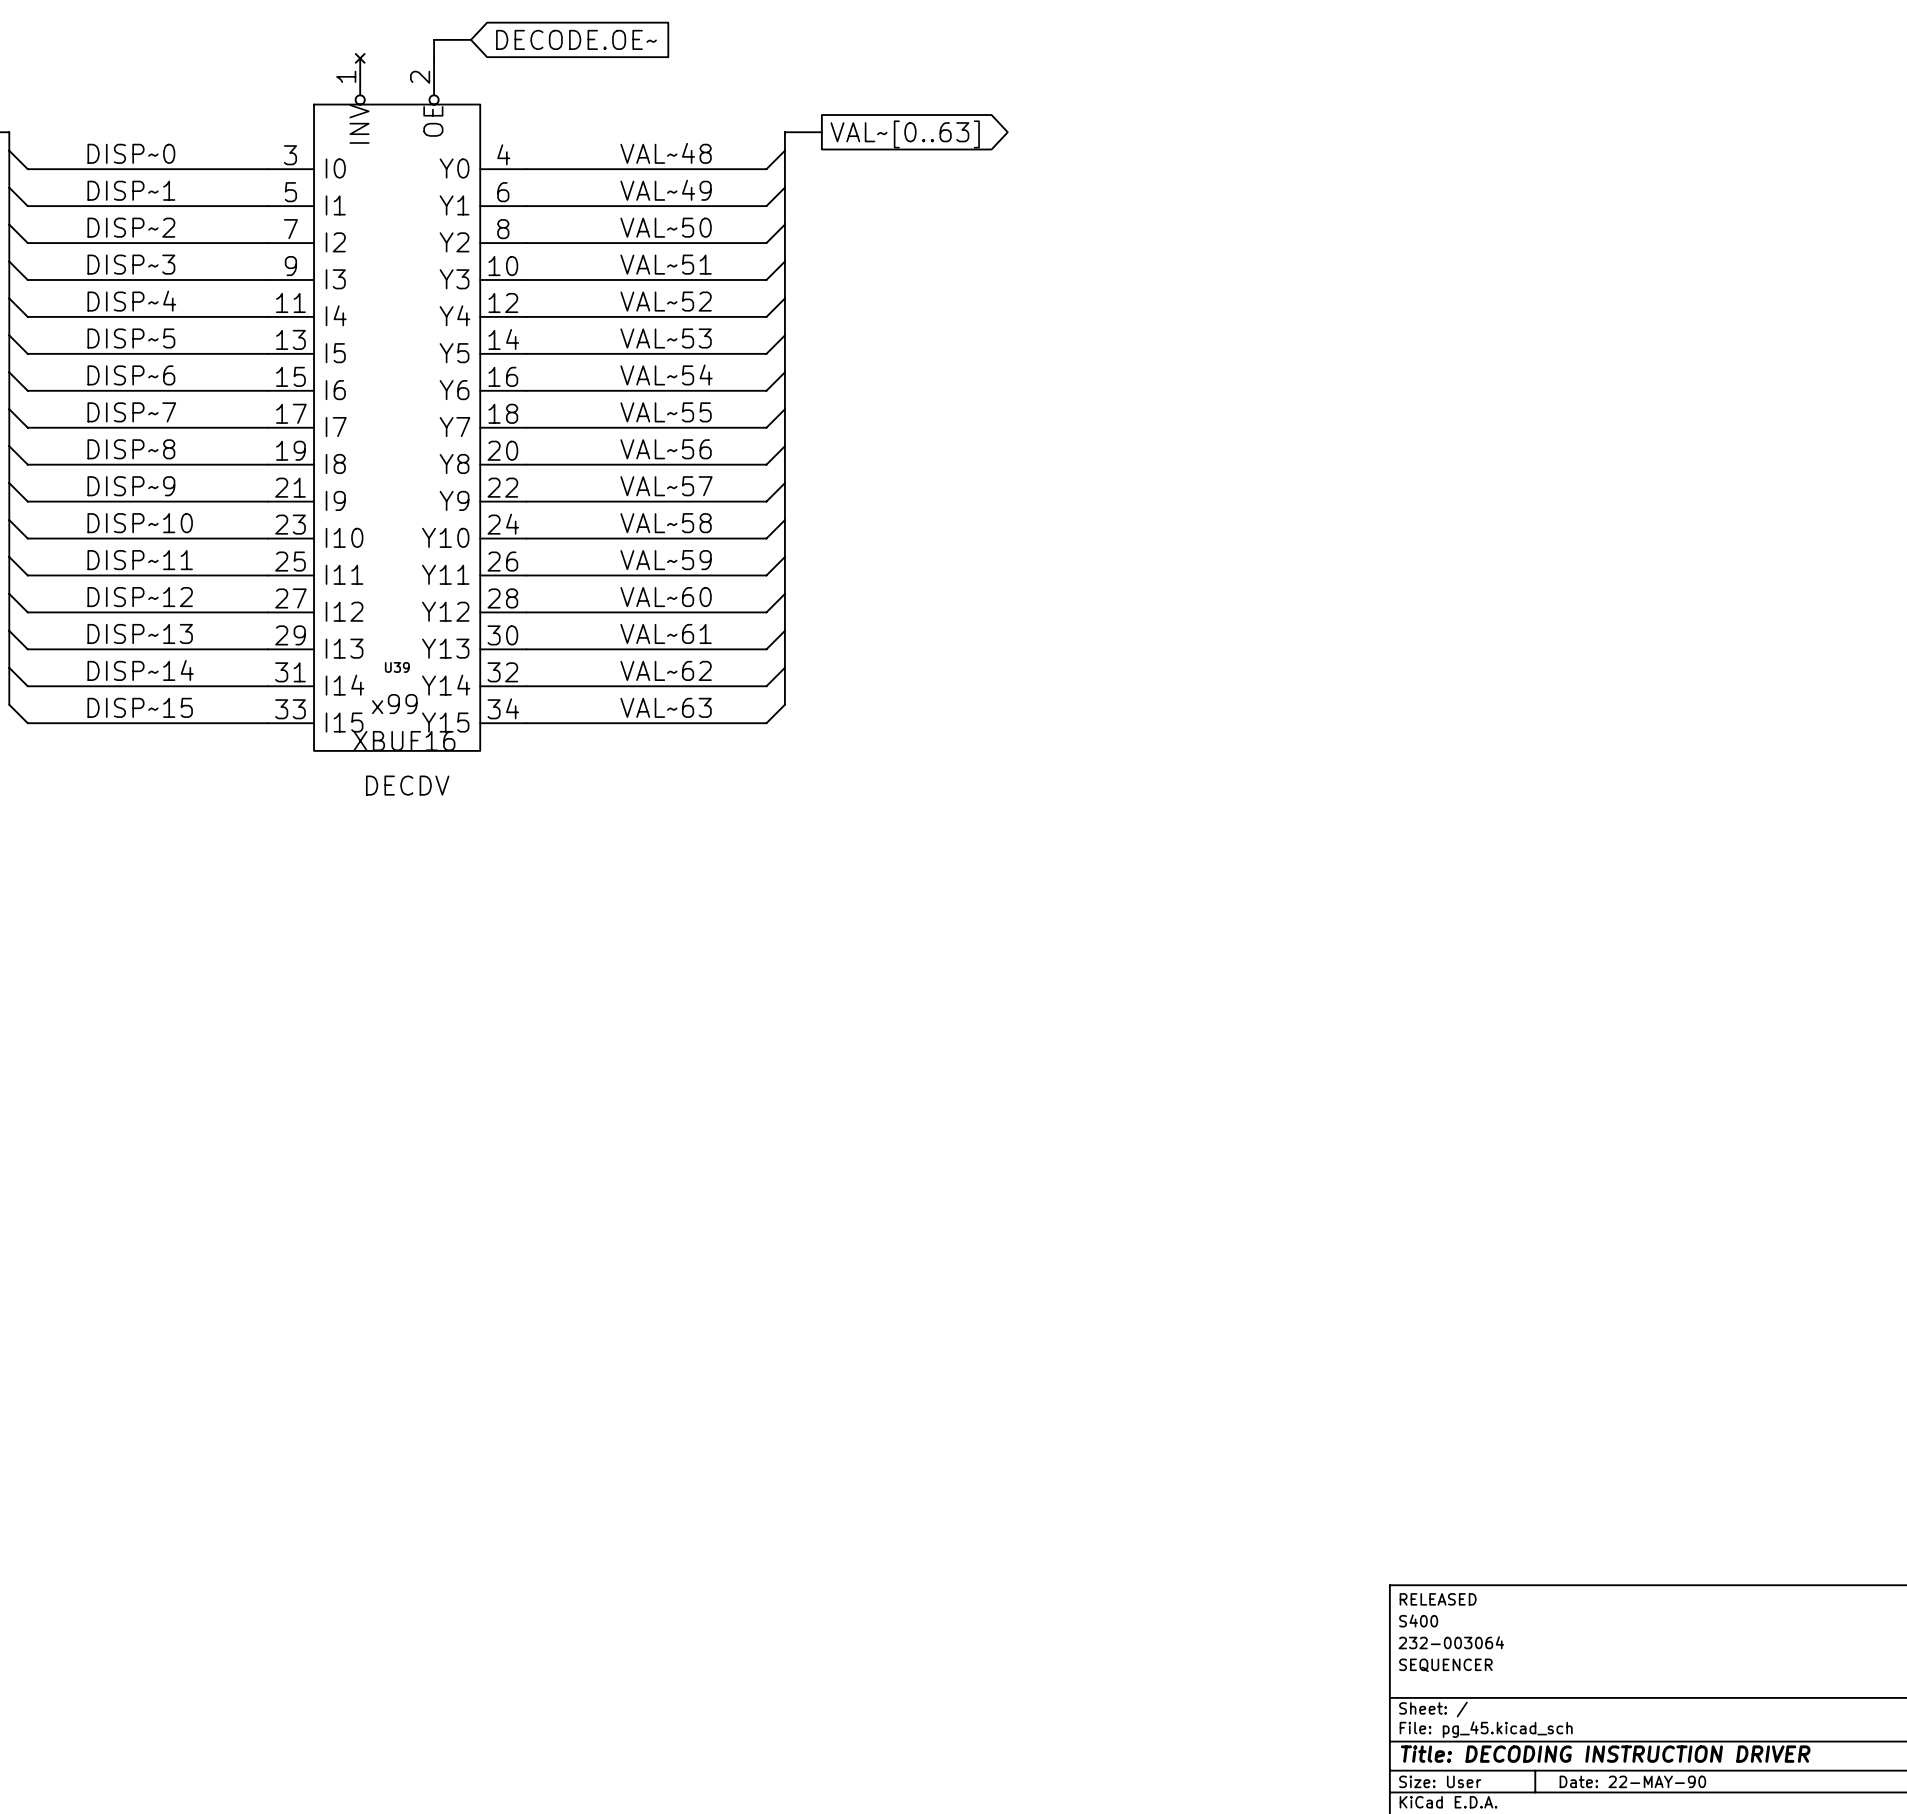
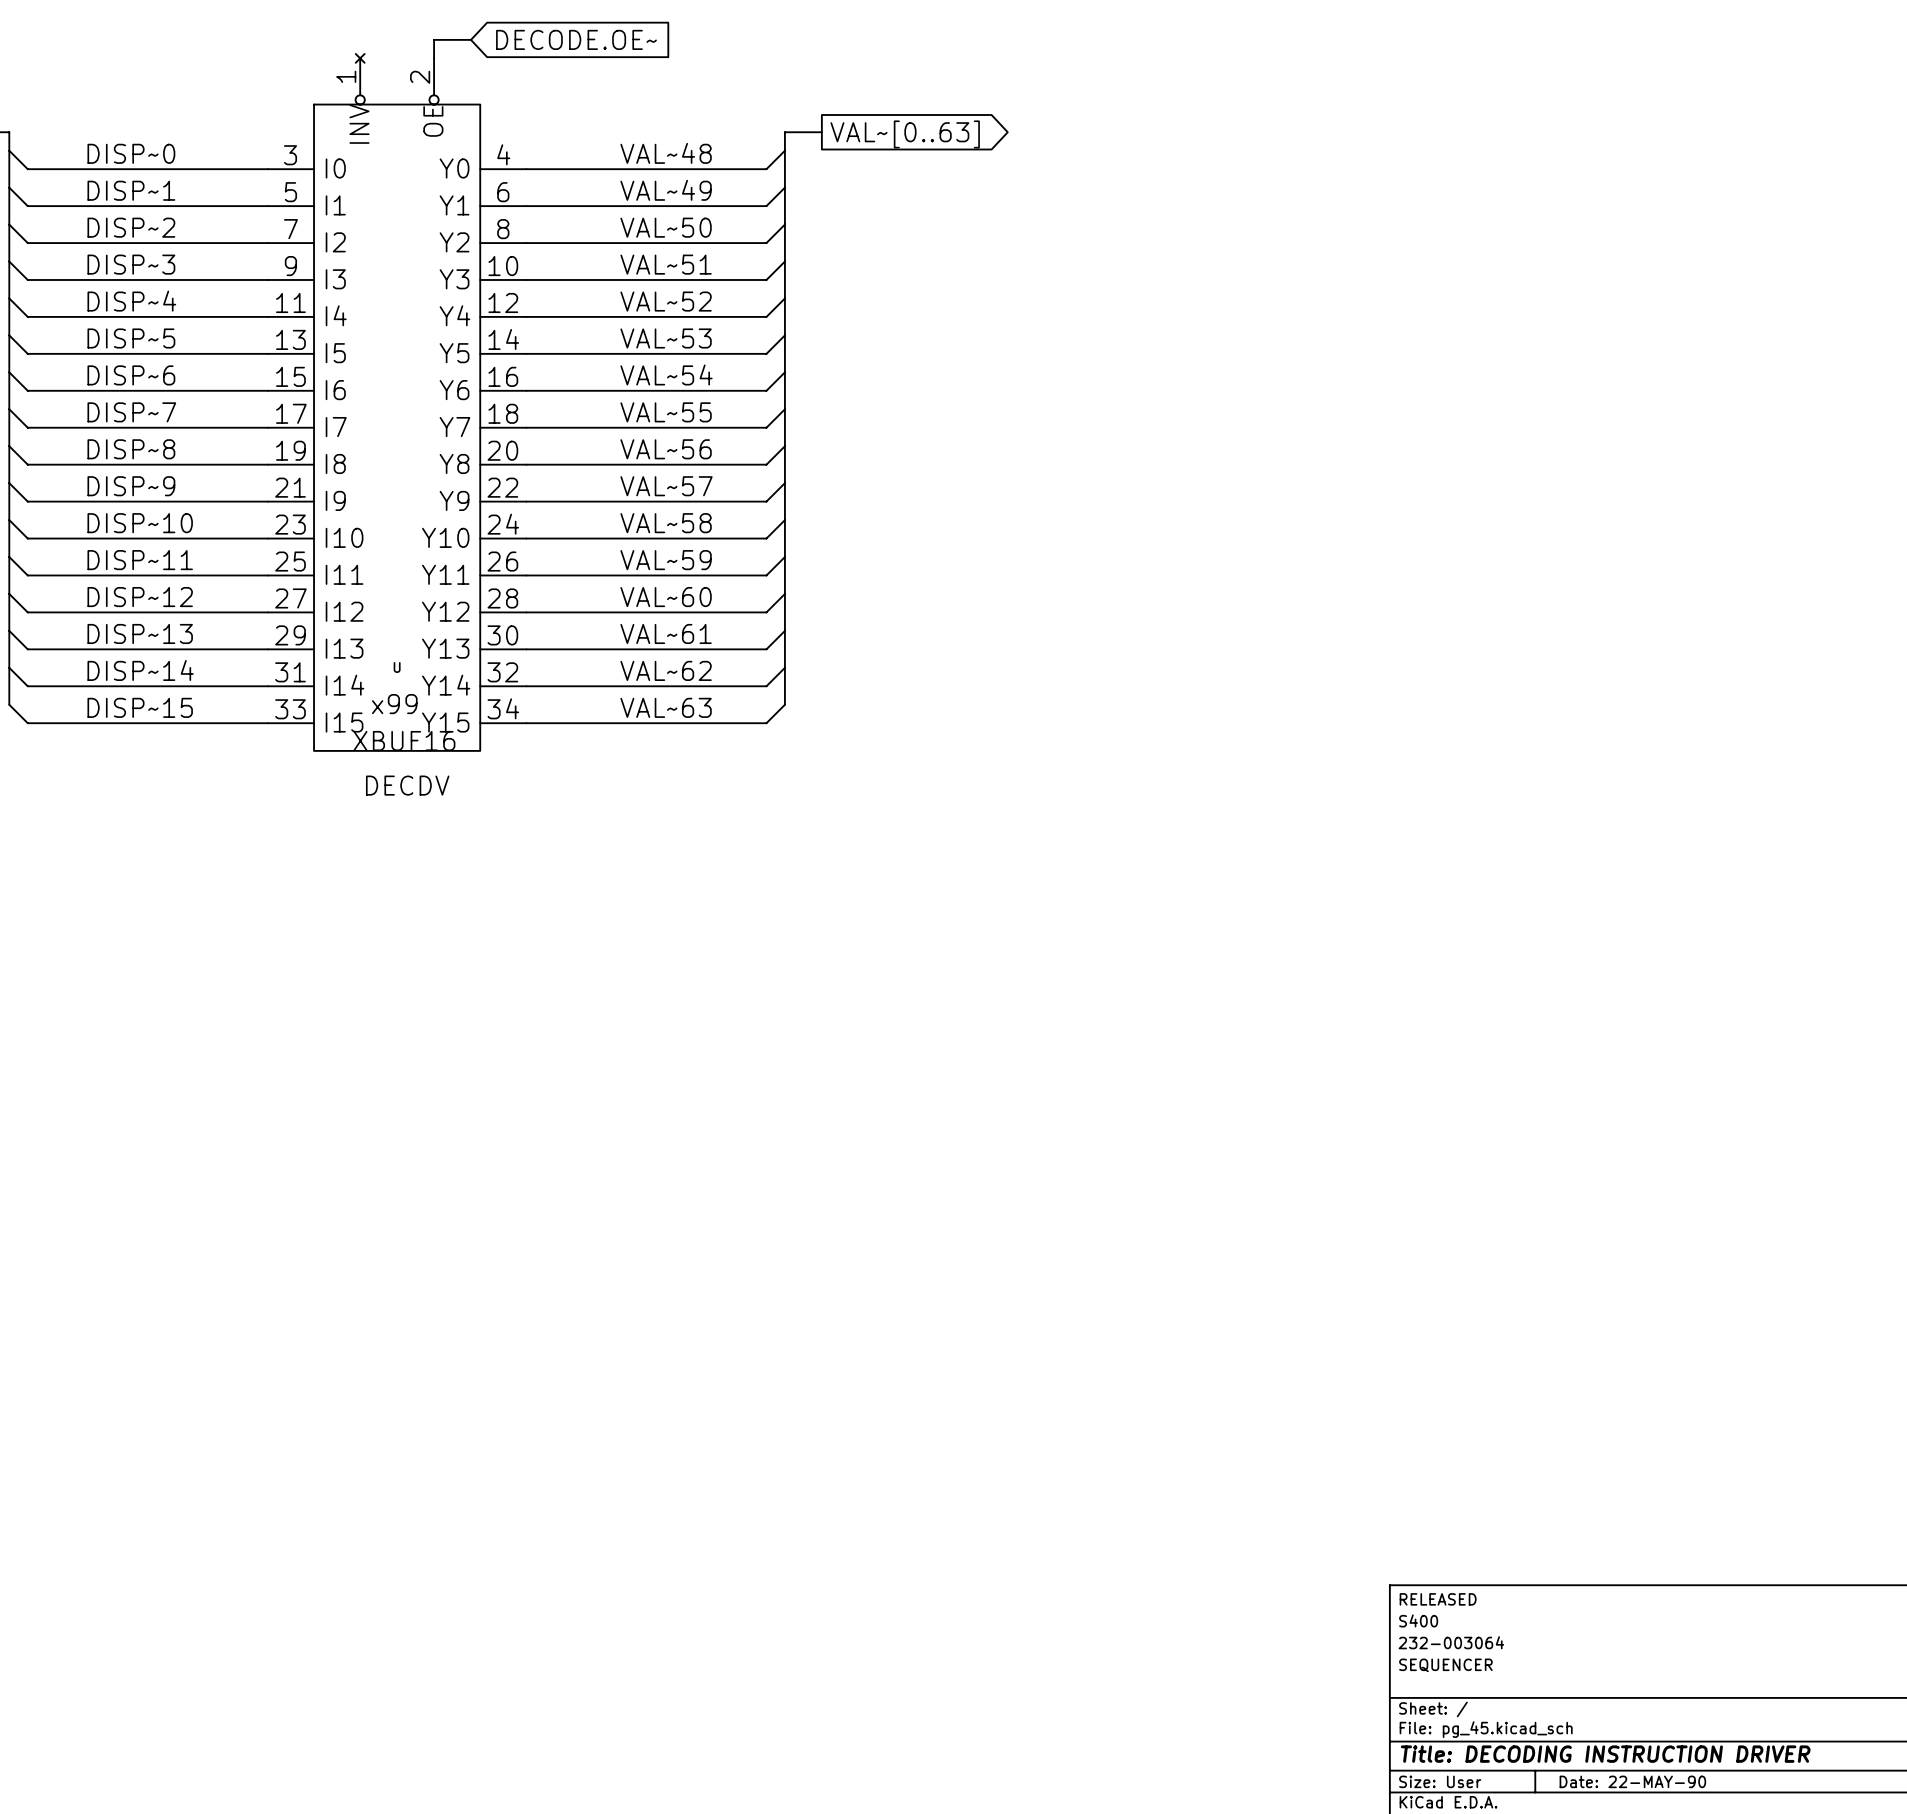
U39 name: U39 (397, 667) -> U (397, 667)

